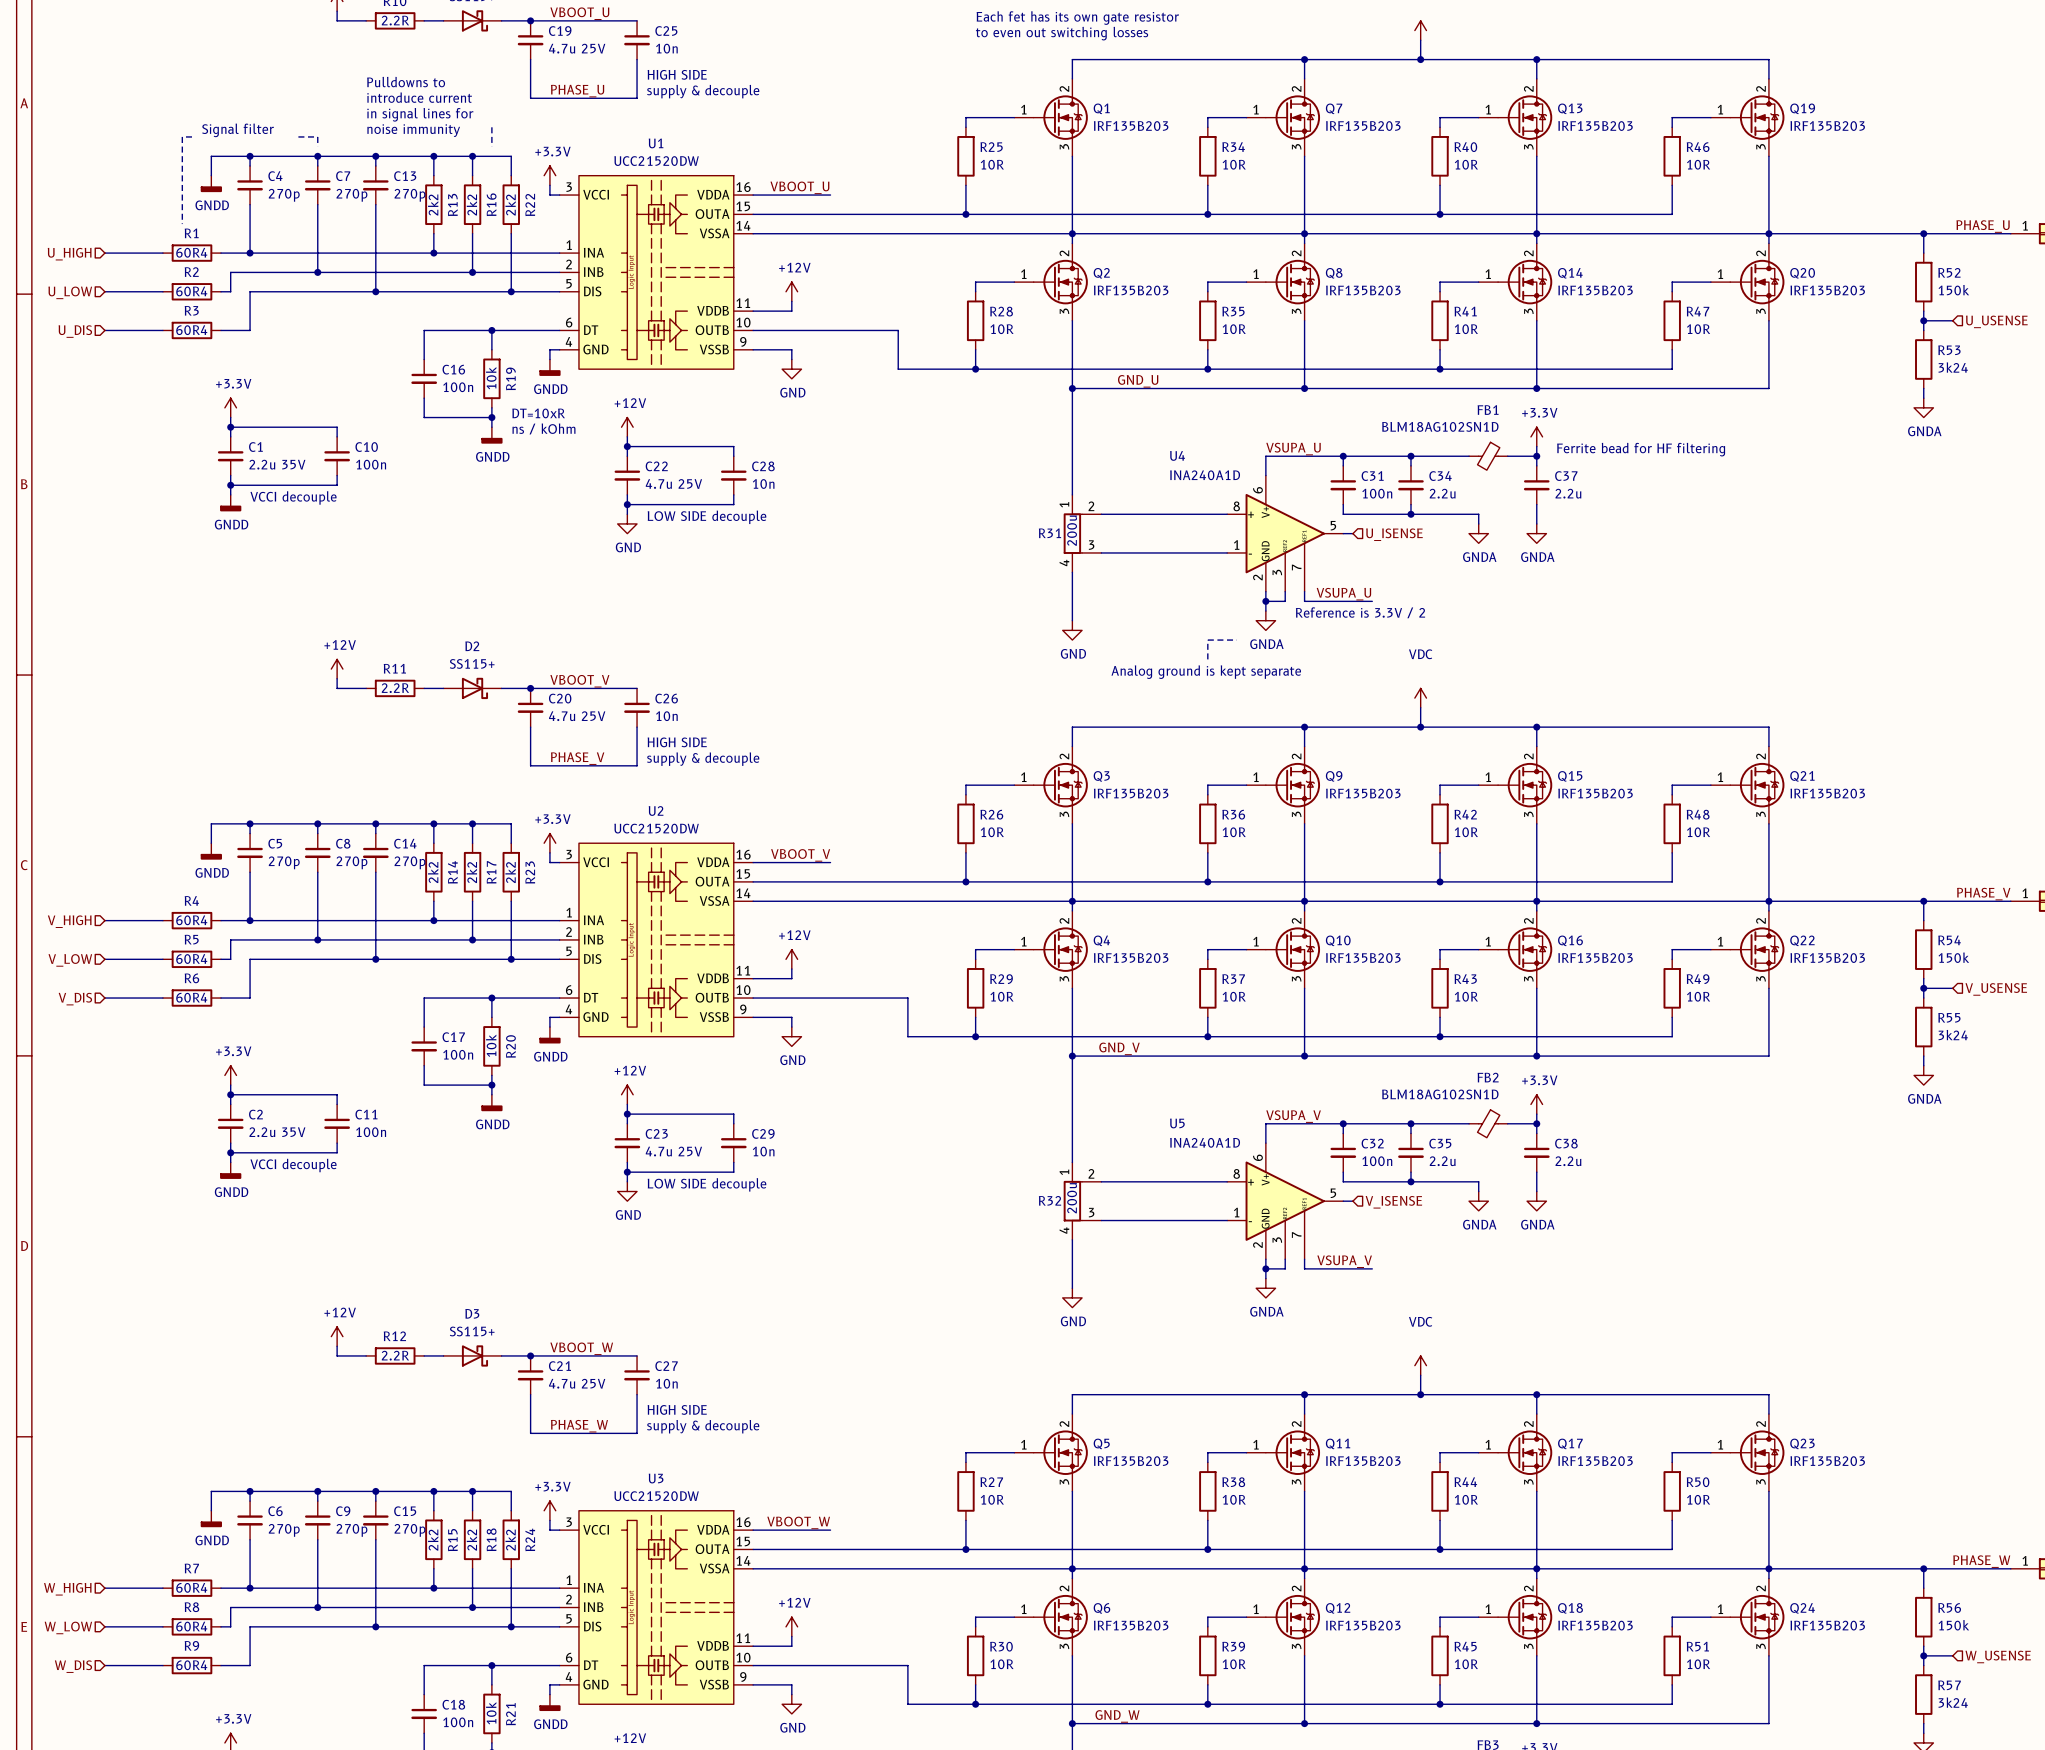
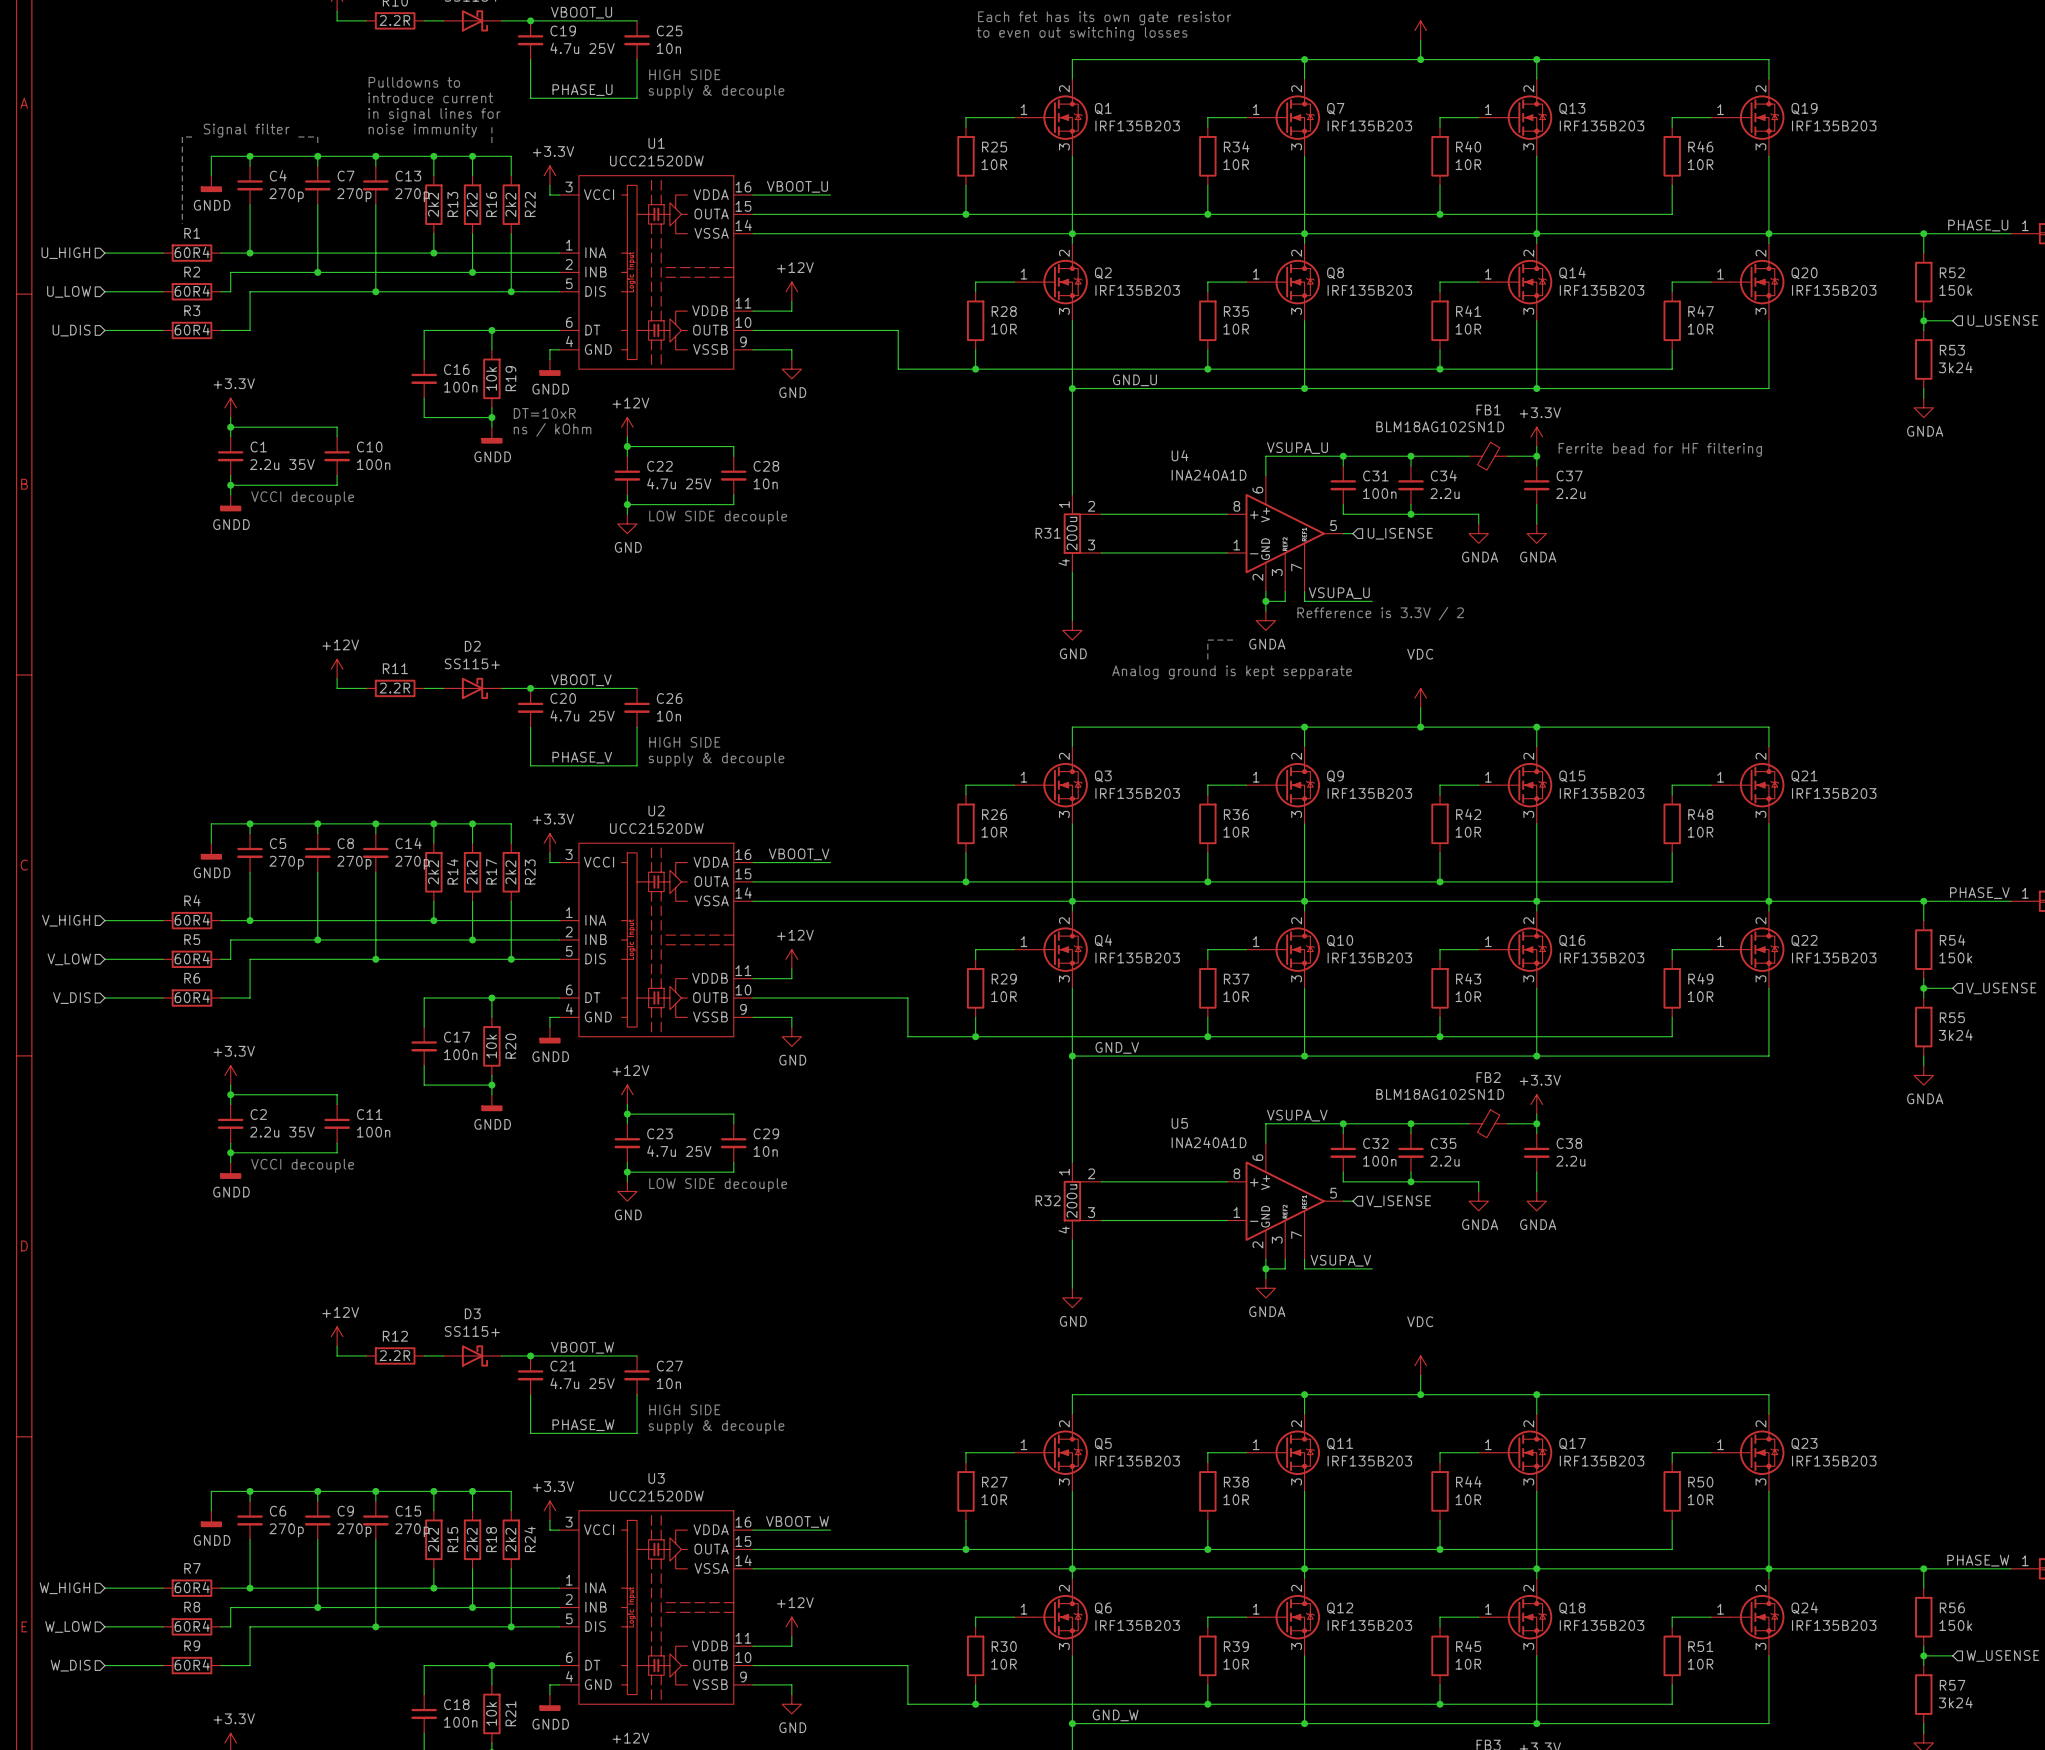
text: Reference is 3.3V / 2 (1360, 612) -> Refference is 3.3V / 2 (1380, 613)
text: Analog ground is kept separate (1206, 672) -> Analog ground is kept sepparate (1232, 672)

